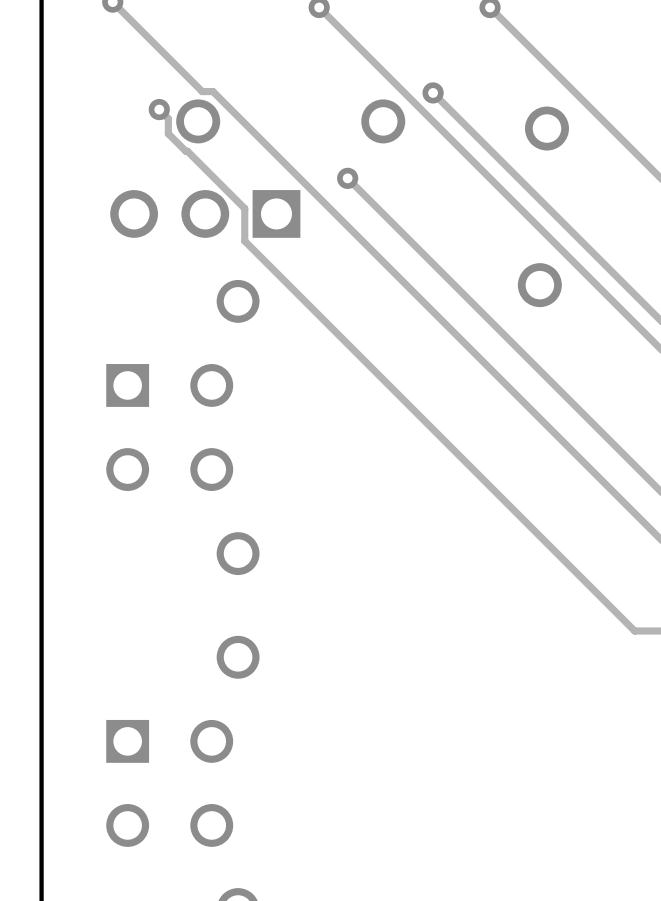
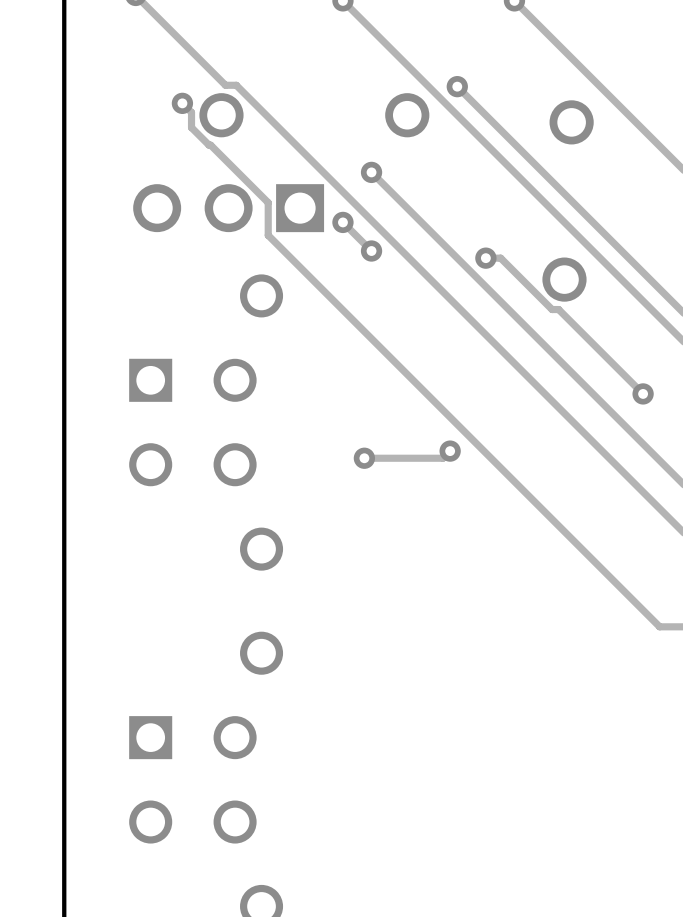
track: none -> (342, 222) (371, 251)
via: none -> (342, 222)
via: none -> (371, 251)
track: none -> (485, 258) (500, 258) (552, 309) (558, 309) (643, 393)
via: none -> (485, 258)
via: none -> (643, 393)
track: none -> (450, 451) (443, 458) (364, 458)
via: none -> (450, 451)
via: none -> (364, 458)

